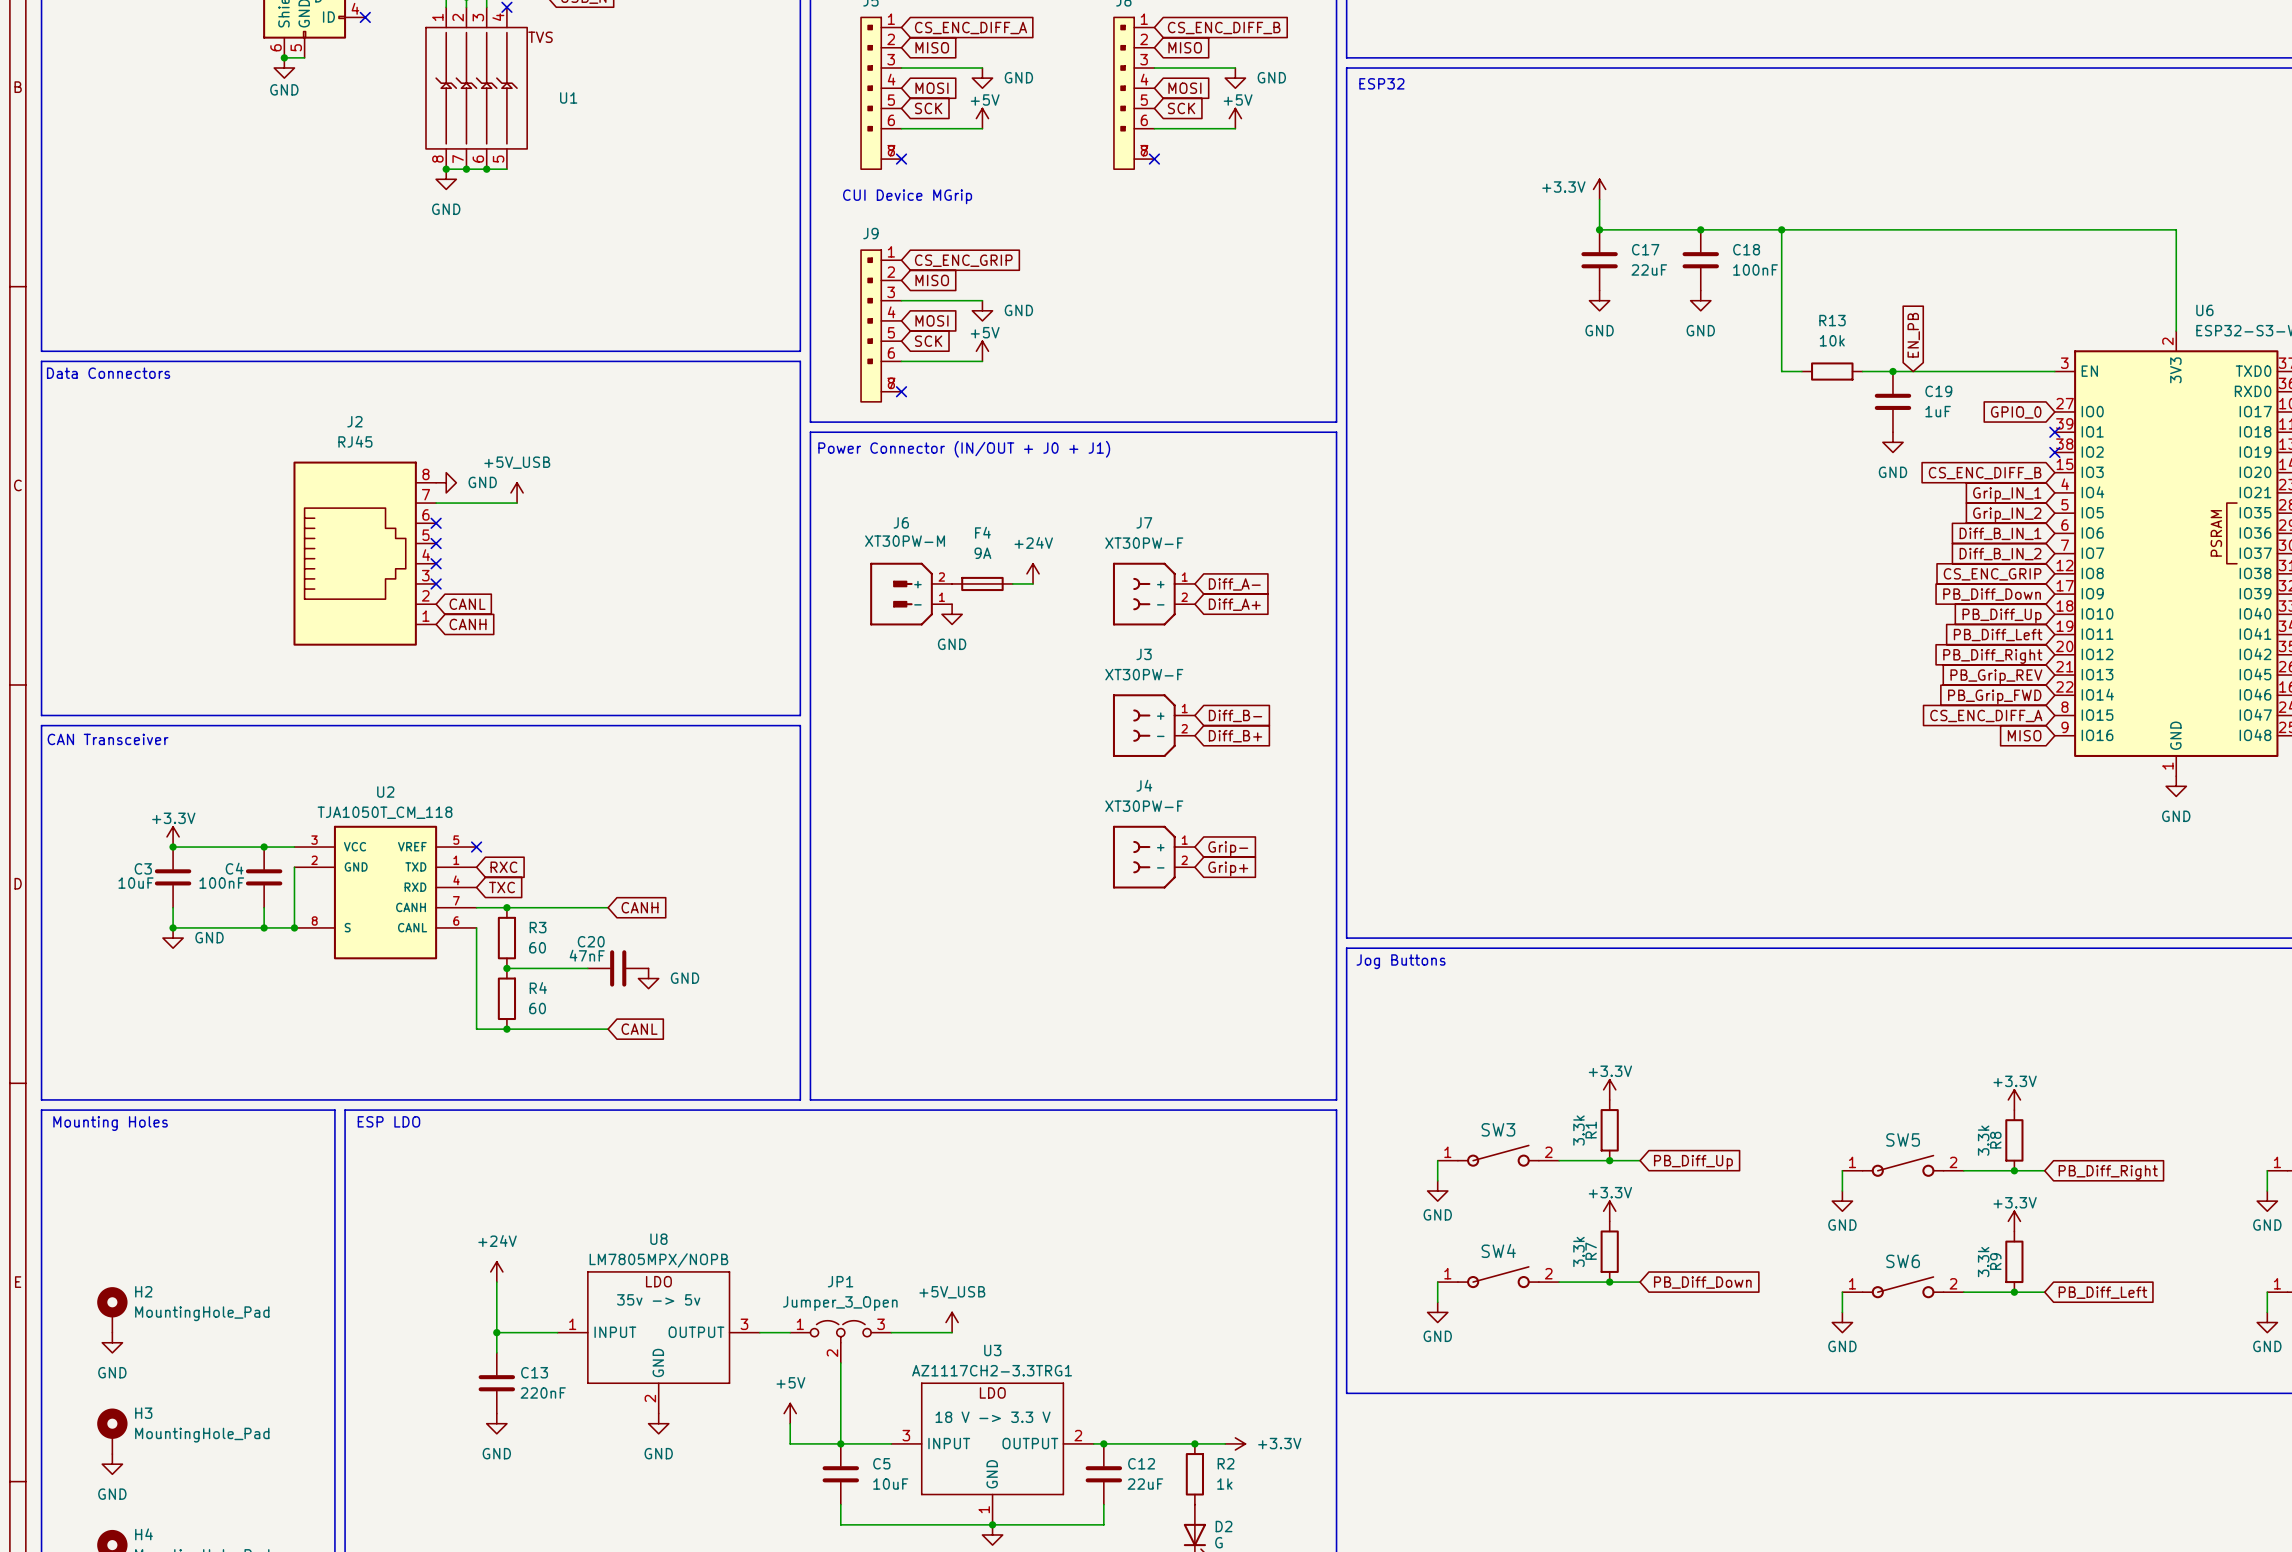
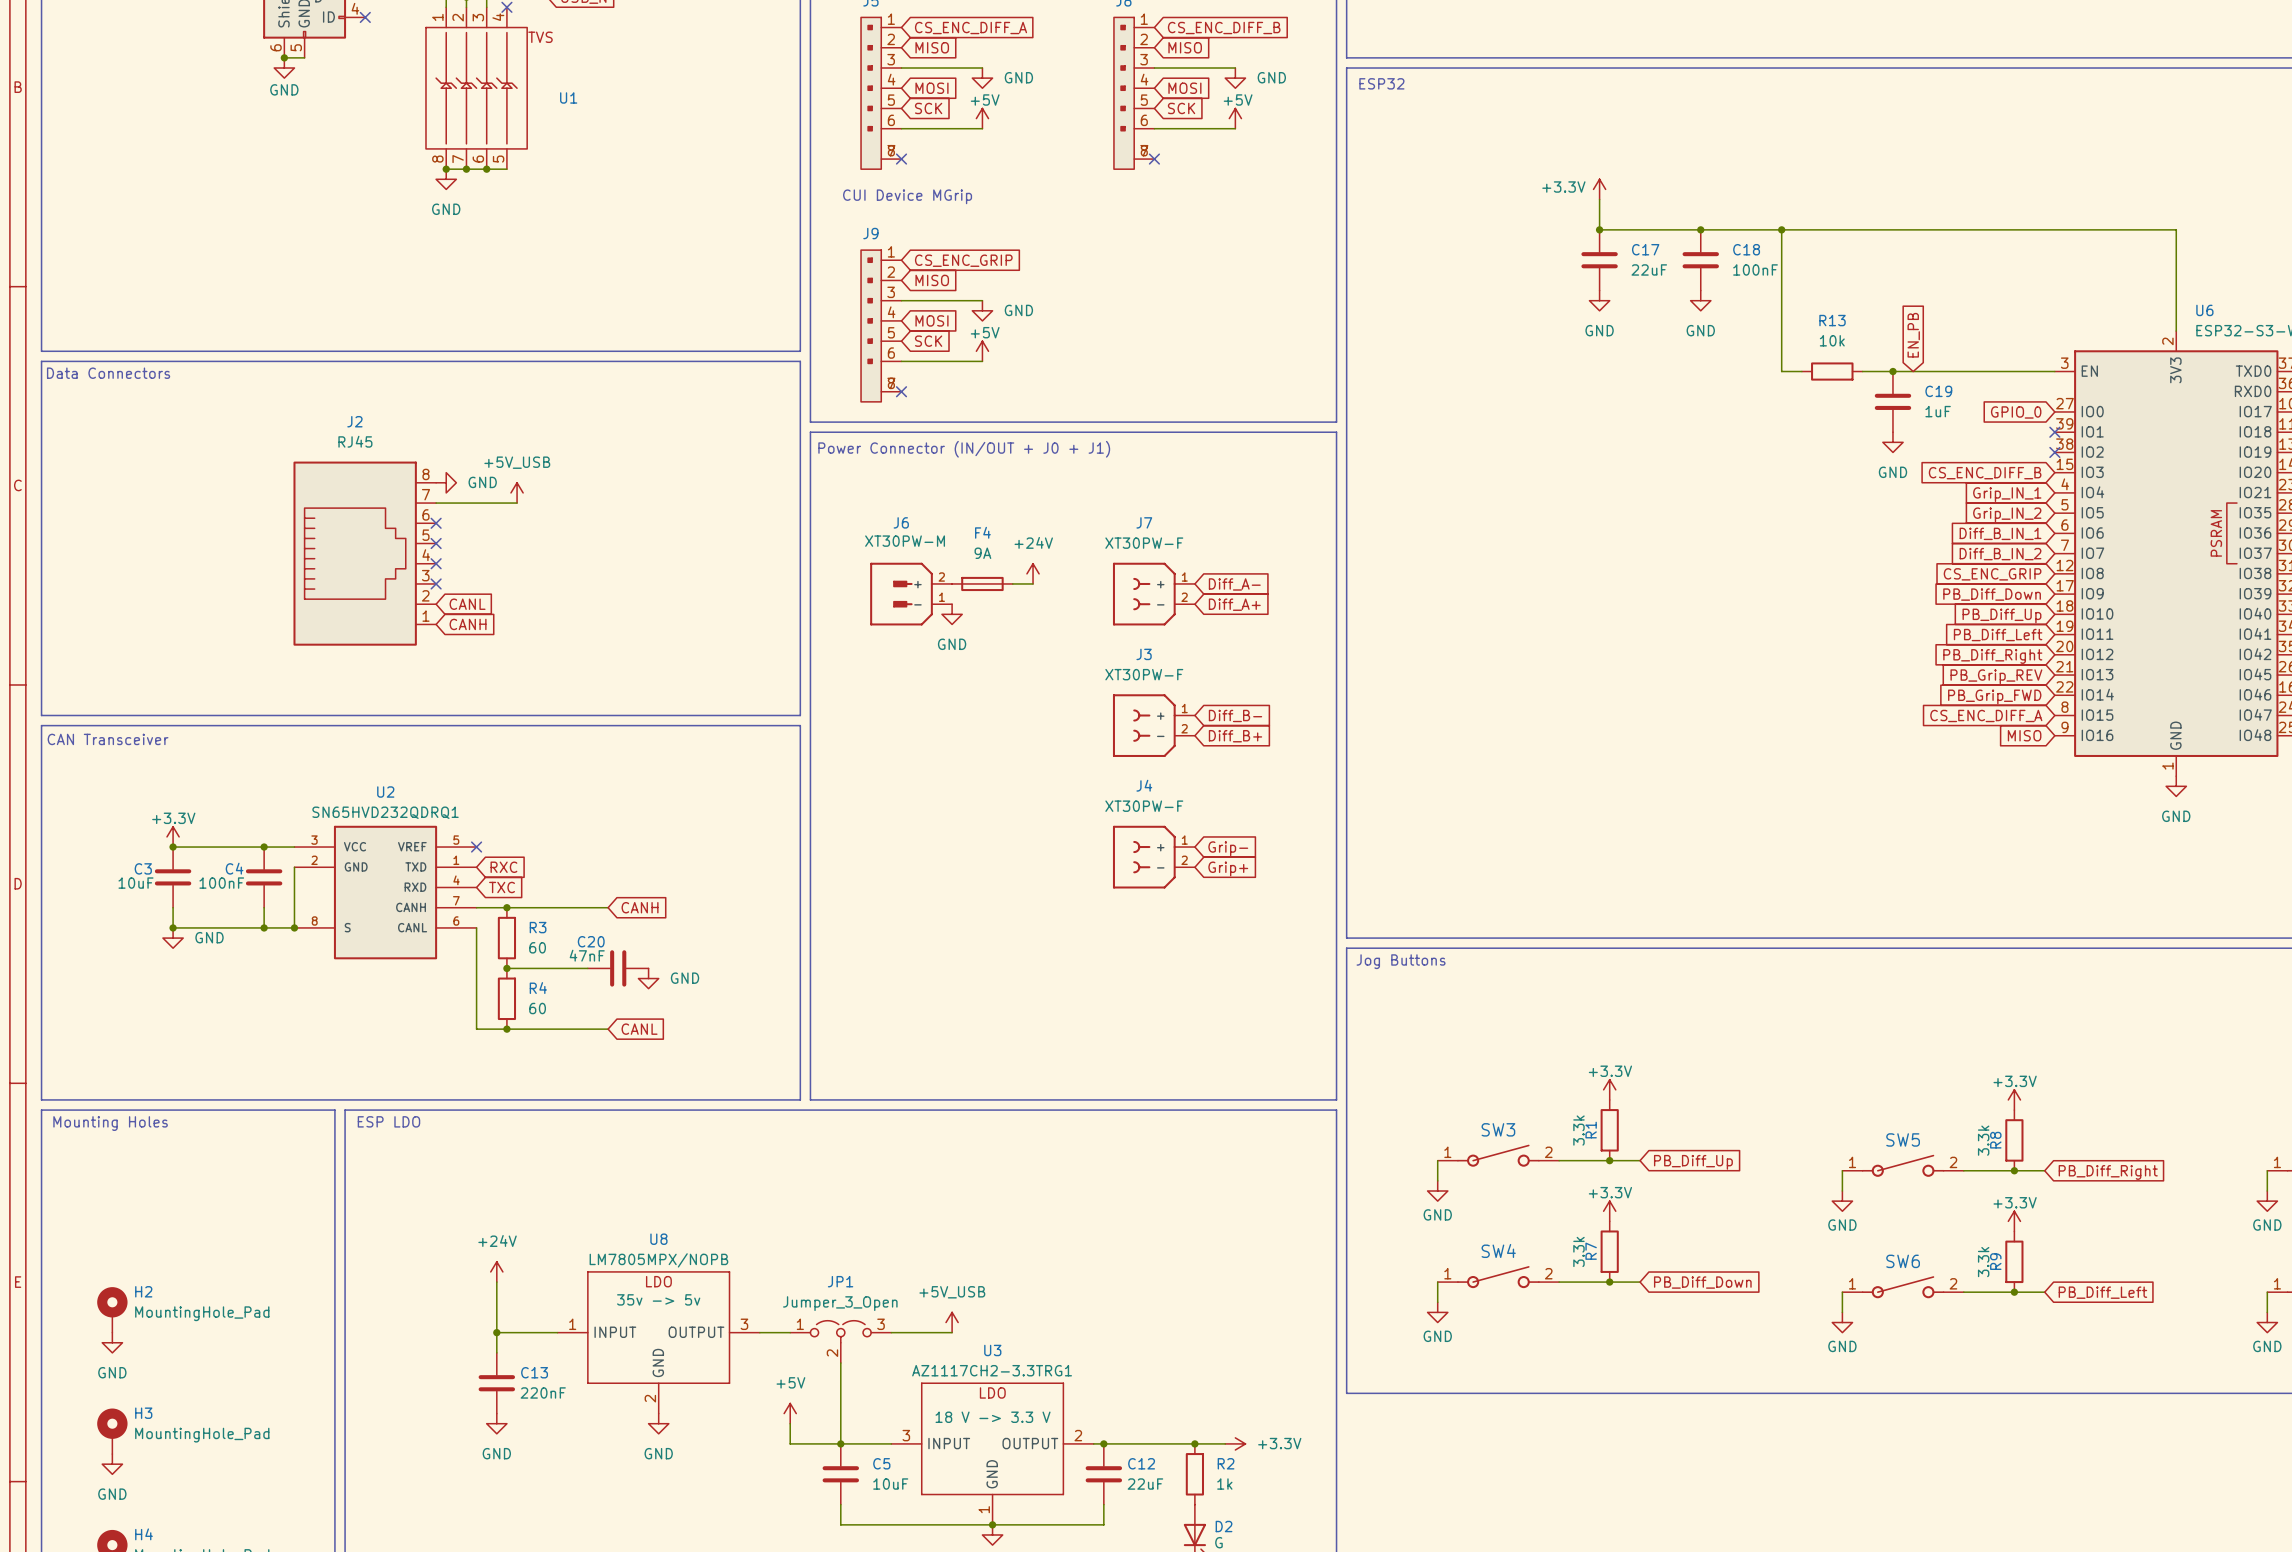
U2 value: TJA1050T_CM_118 (385, 812) -> SN65HVD232QDRQ1 (385, 812)

